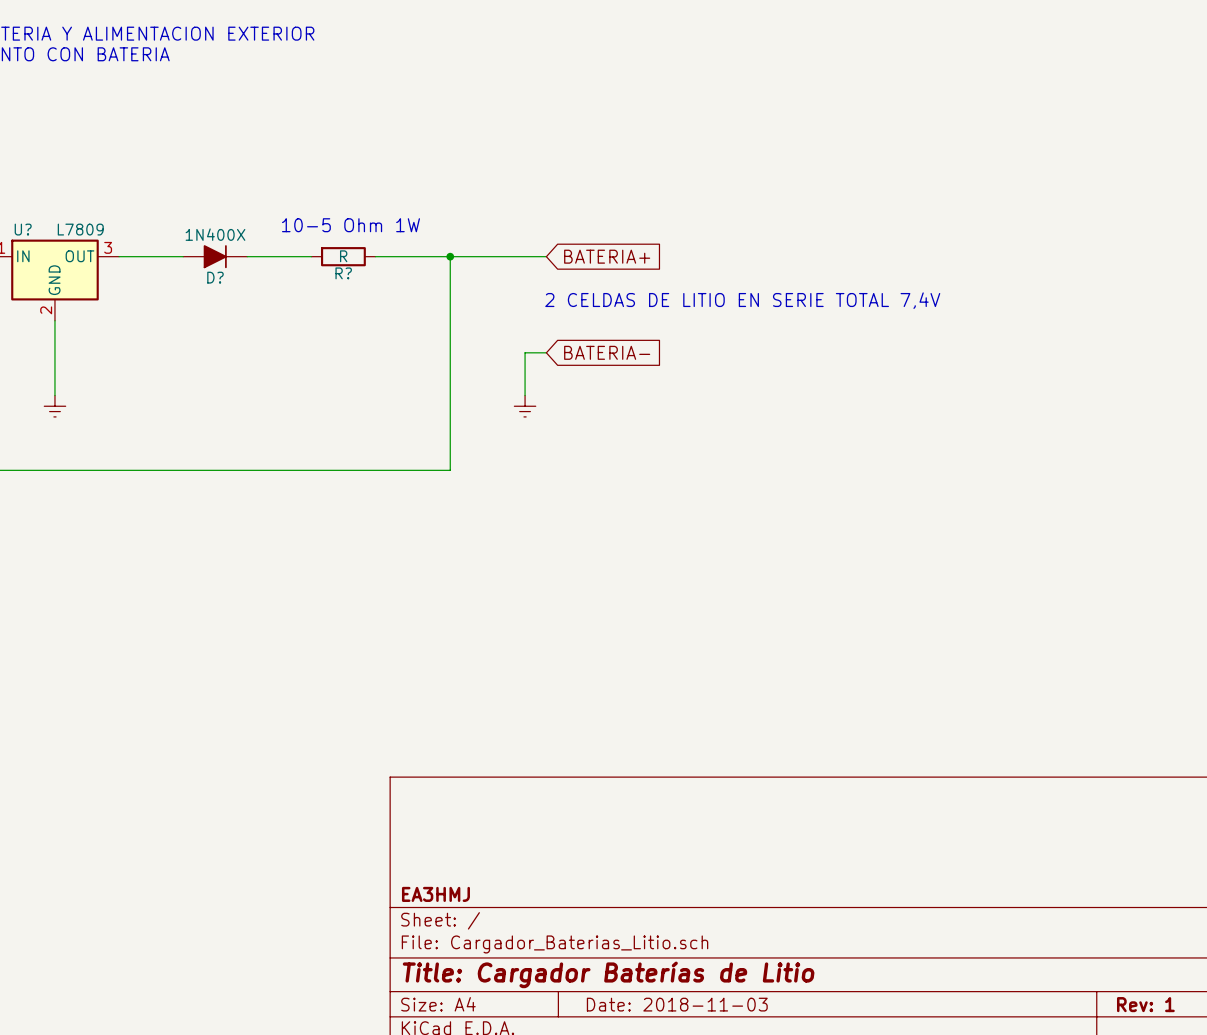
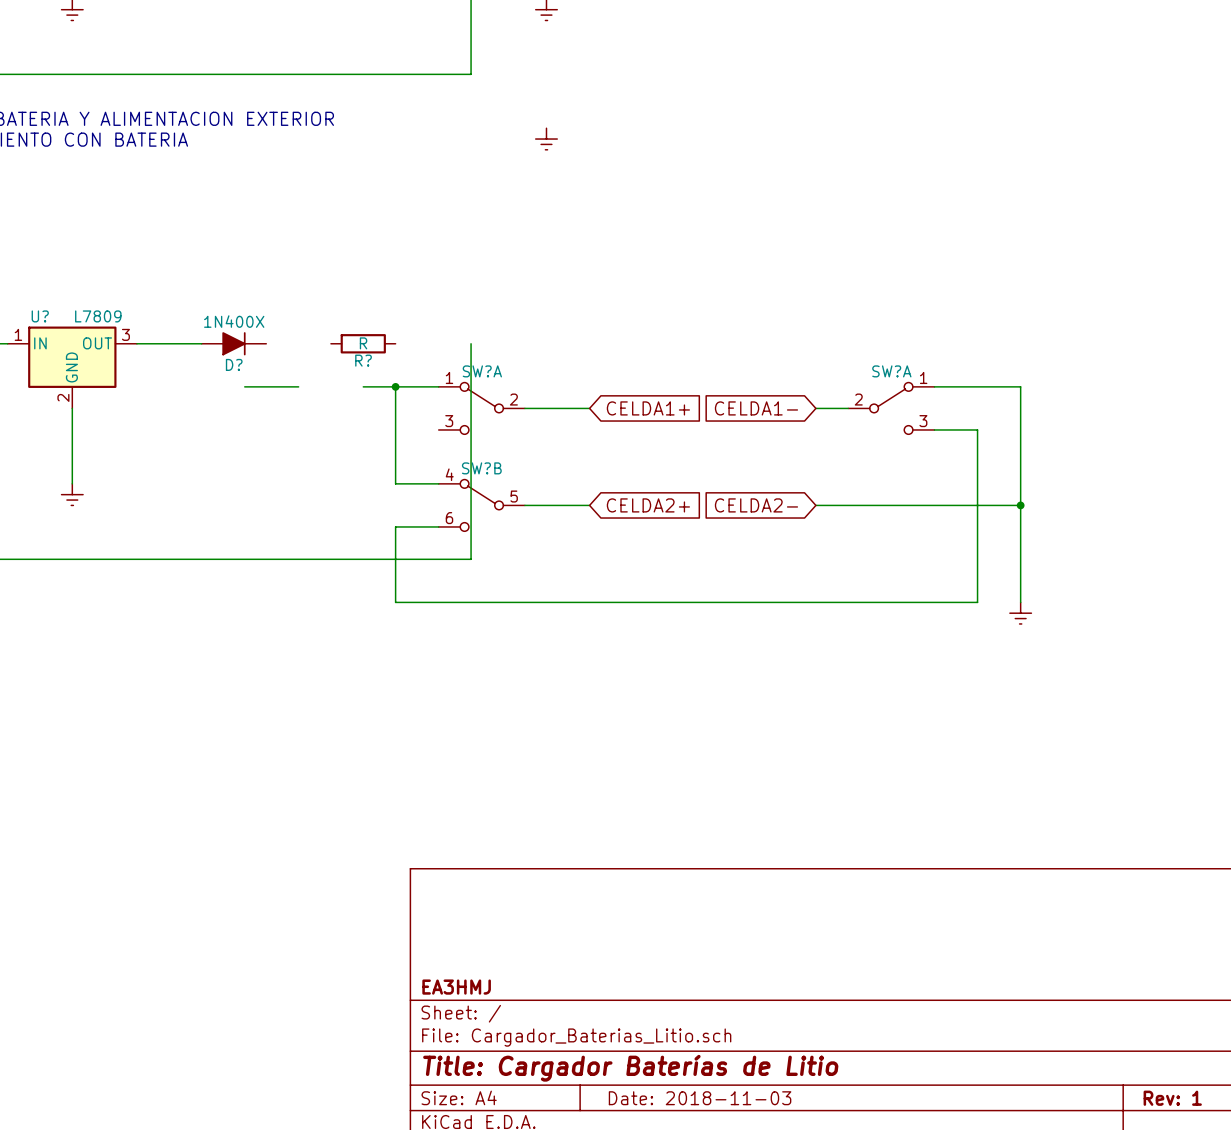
power symbol: none -> (546, 139)
text: 10-5 Ohm 1W (350, 225) -> none
wire: (247, 256) (311, 256) -> none
wire: (375, 256) (546, 256) -> none
junction: (450, 256) -> none
global label: BATERIA+ (607, 256) -> none
wire: none -> (244, 386) (298, 386)
wire: none -> (363, 386) (438, 386)
wire: none -> (395, 386) (395, 483) (438, 483)
junction: none -> (395, 386)
wire: none -> (934, 386) (1020, 386) (1020, 602)
text: 2 CELDAS DE LITIO EN SERIE TOTAL 7,4V (742, 300) -> none
SW?A: none -> (481, 408)
wire: none -> (524, 408) (589, 408)
global label: none -> CELDA1+ (648, 408)
global label: none -> CELDA1- (756, 408)
wire: none -> (815, 408) (848, 408)
SW?A: none -> (891, 408)
wire: none -> (934, 429) (977, 429) (977, 602) (395, 602) (395, 526) (438, 526)
wire: (546, 352) (525, 352) (525, 395) -> none
global label: BATERIA- (607, 352) -> none
power symbol: (525, 406) -> none
SW?B: none -> (481, 505)
wire: none -> (524, 505) (589, 505)
global label: none -> CELDA2+ (648, 505)
global label: none -> CELDA2- (756, 505)
wire: none -> (815, 505) (1020, 505)
junction: none -> (1020, 505)
power symbol: none -> (1020, 613)

